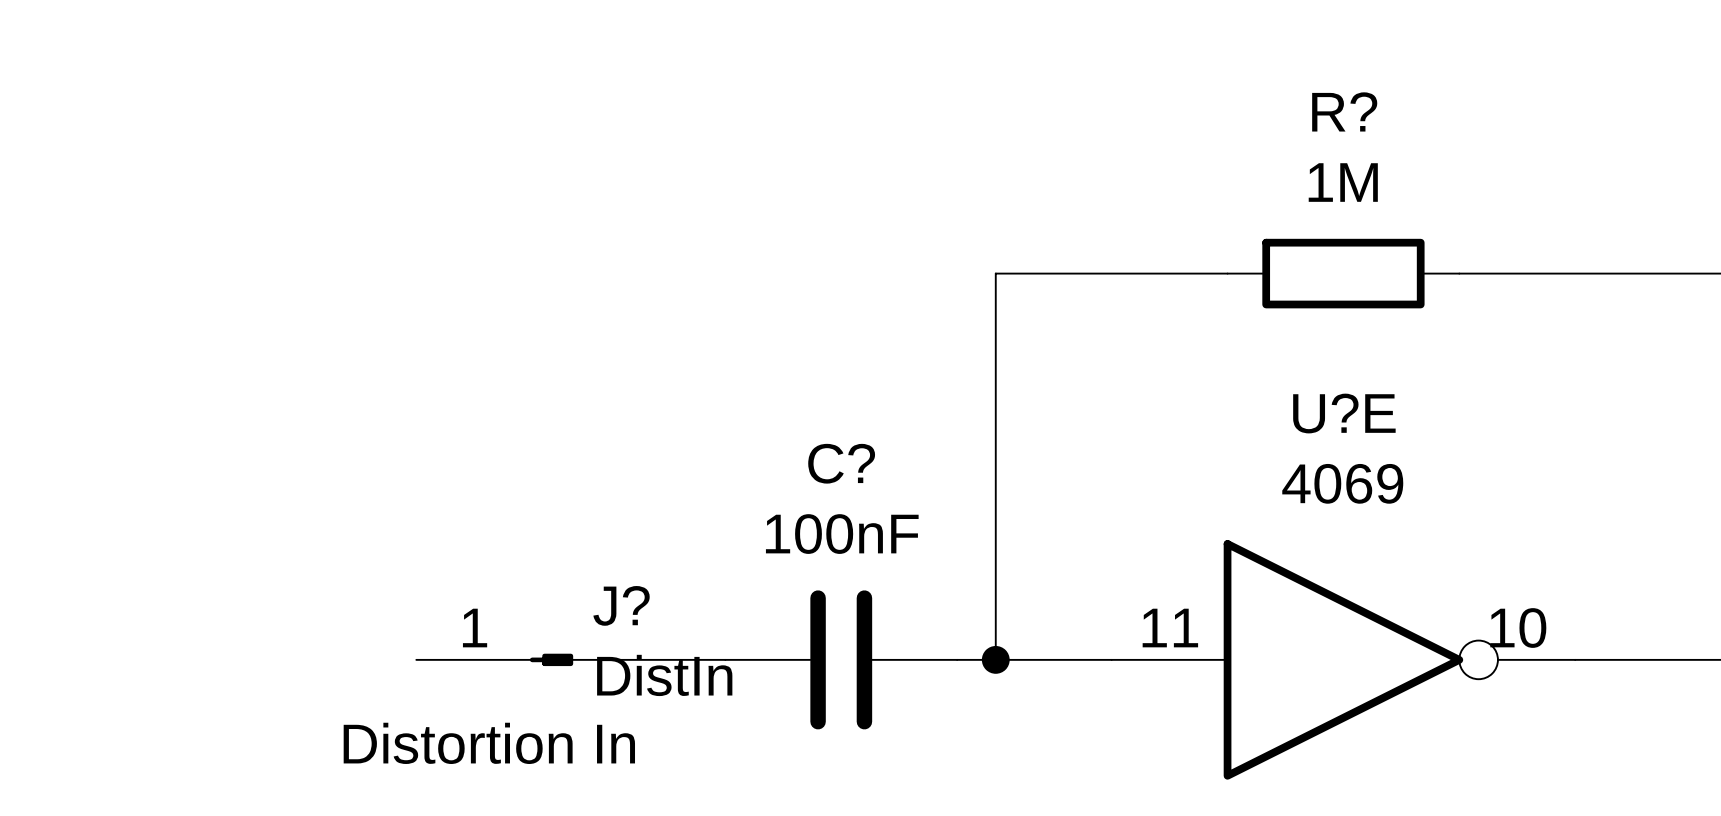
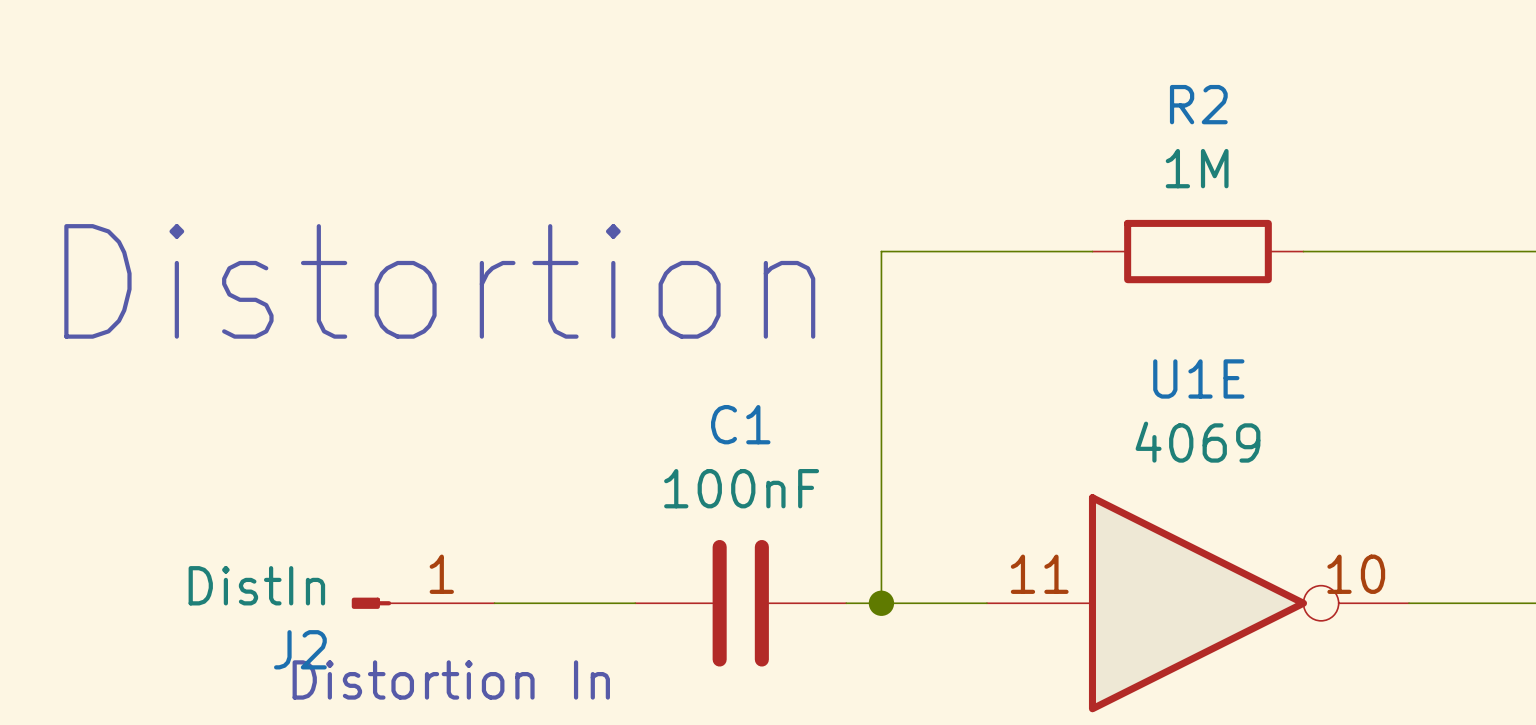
R? name: R? (1344, 111) -> R2 (1198, 104)
text: none -> Distortion (439, 281)
U?E name: U?E (1344, 413) -> U1E (1198, 378)
C? name: C? (841, 463) -> C1 (740, 424)
J2: none -> DistIn (423, 603)
J?: DistIn (494, 659) -> none

